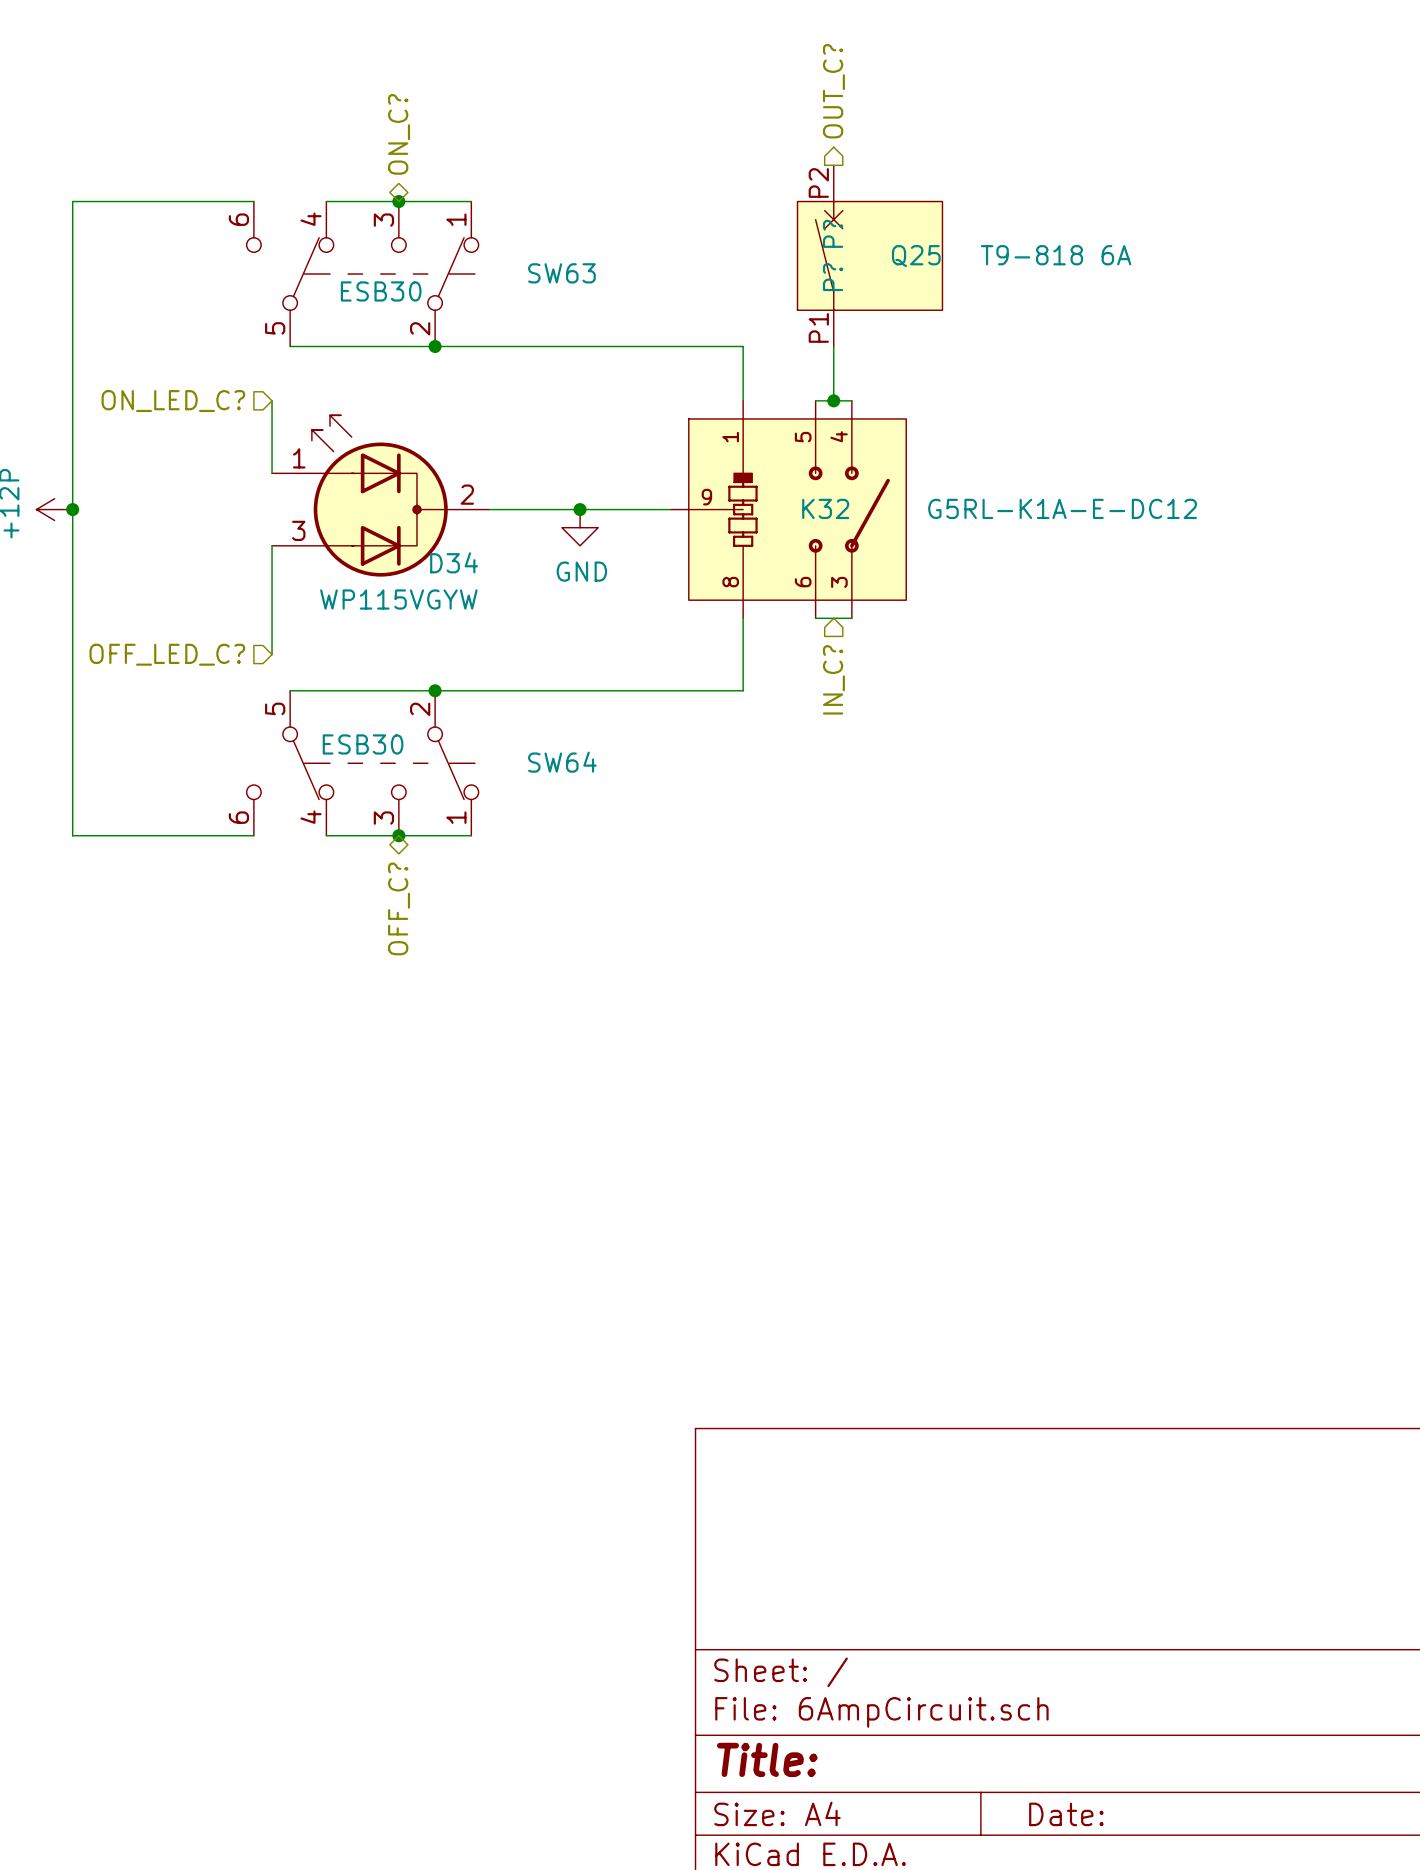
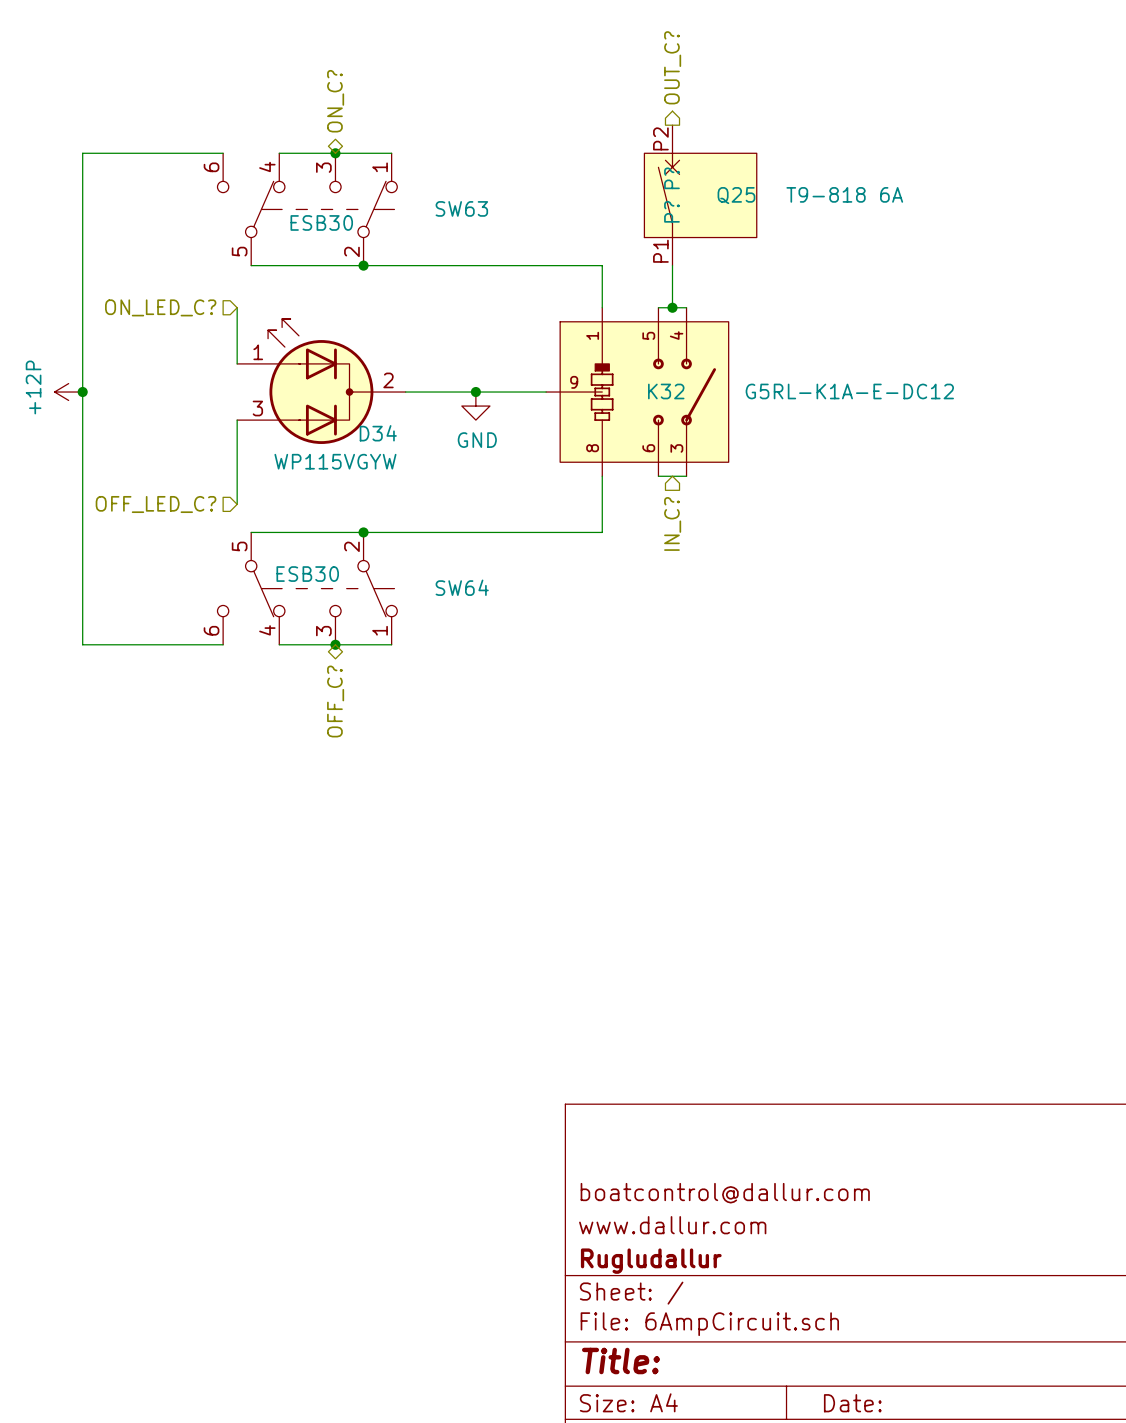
title block: none -> boatcontrol@dallur.com (725, 1193)
title block: none -> www.dallur.com (672, 1225)
title block: none -> Rugludallur (651, 1261)

